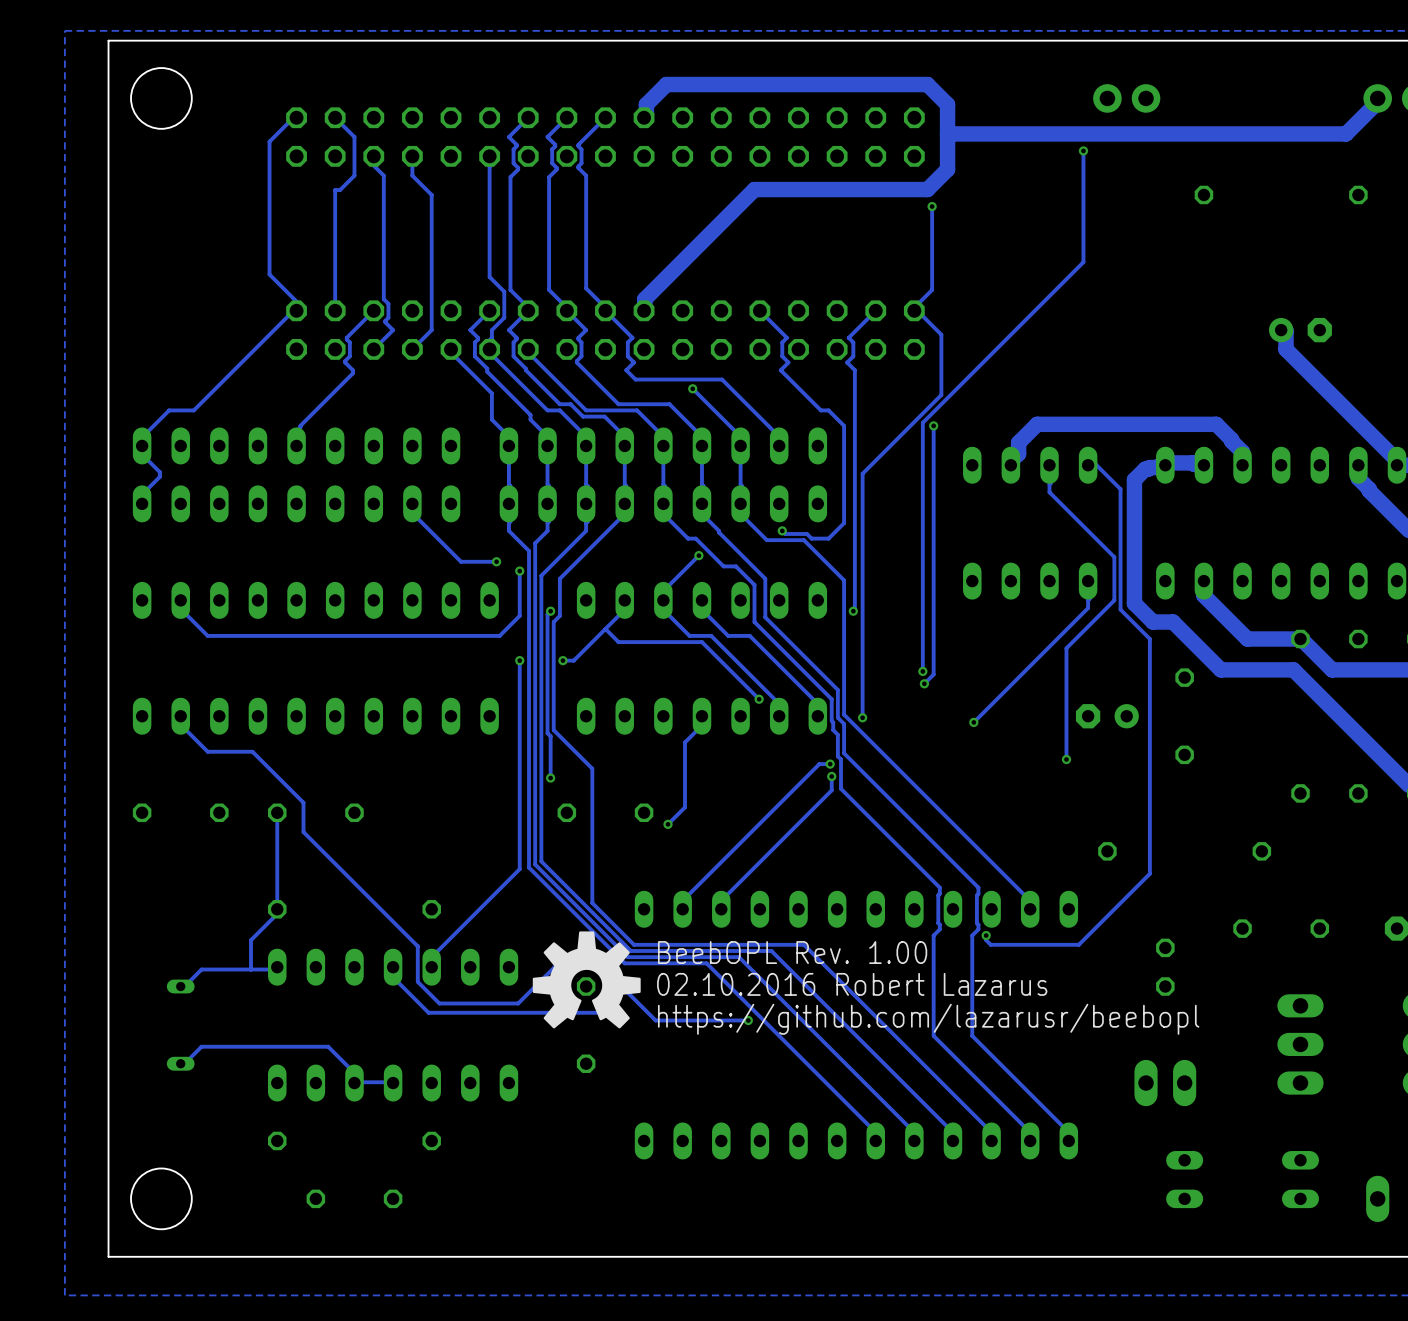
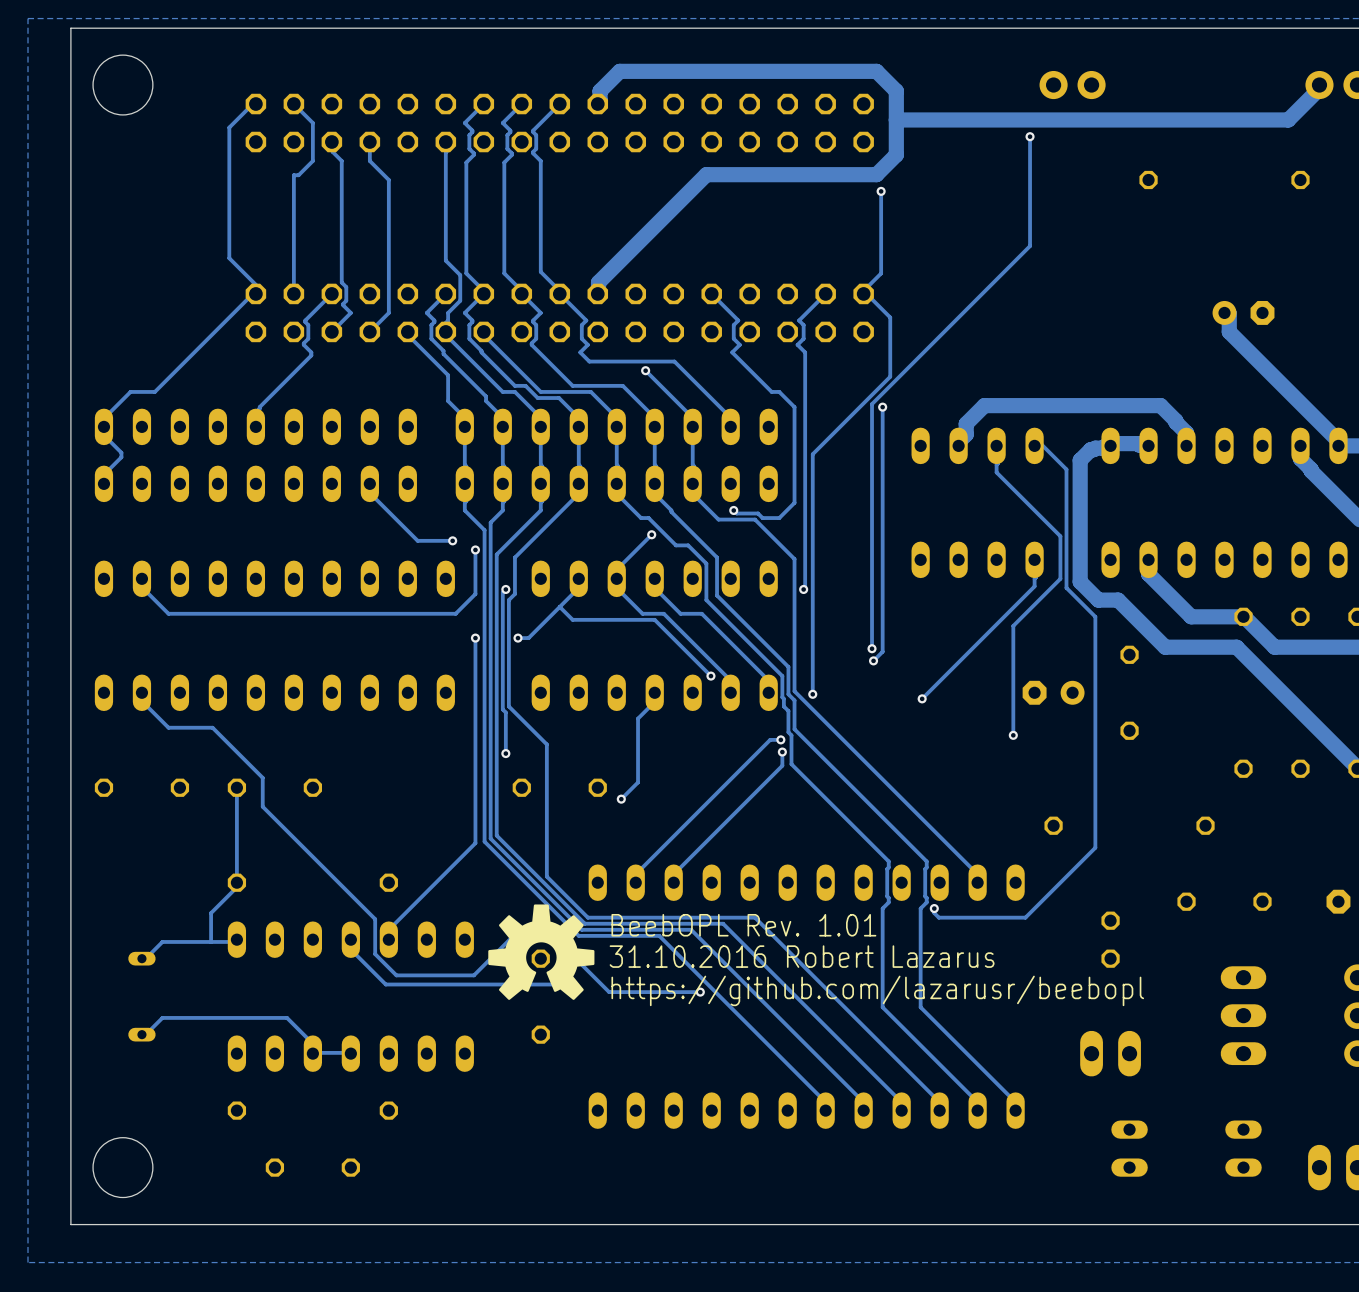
text: BeebOPL Rev. 1.00 (792, 952) -> BeebOPL Rev. 1.01 (743, 925)
text: 02.10.2016 Robert Lazarus (852, 984) -> 31.10.2016 Robert Lazarus (802, 956)

